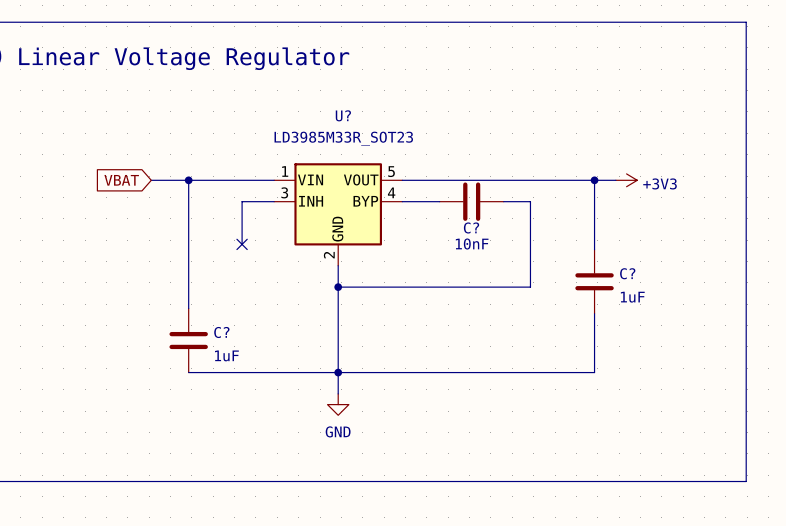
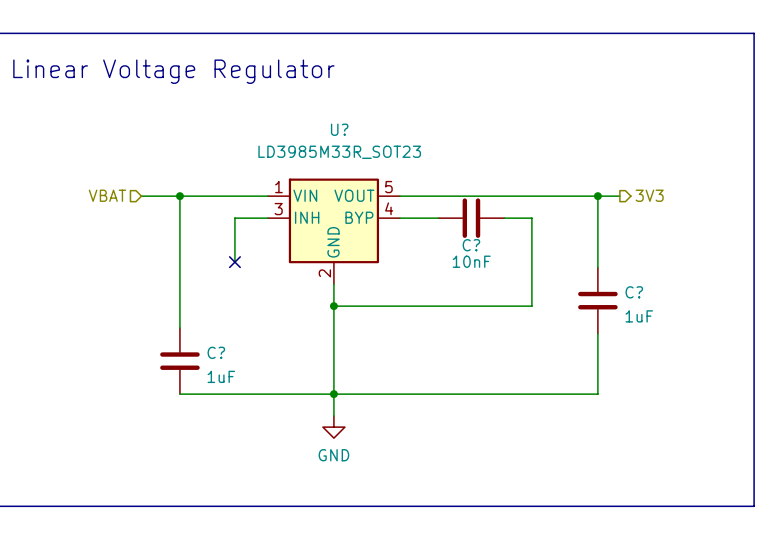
hierarchical label: none -> VBAT (107, 195)
hierarchical label: none -> 3V3 (649, 195)
global label: VBAT (121, 180) -> none
power symbol: +3V3 (626, 180) -> none

